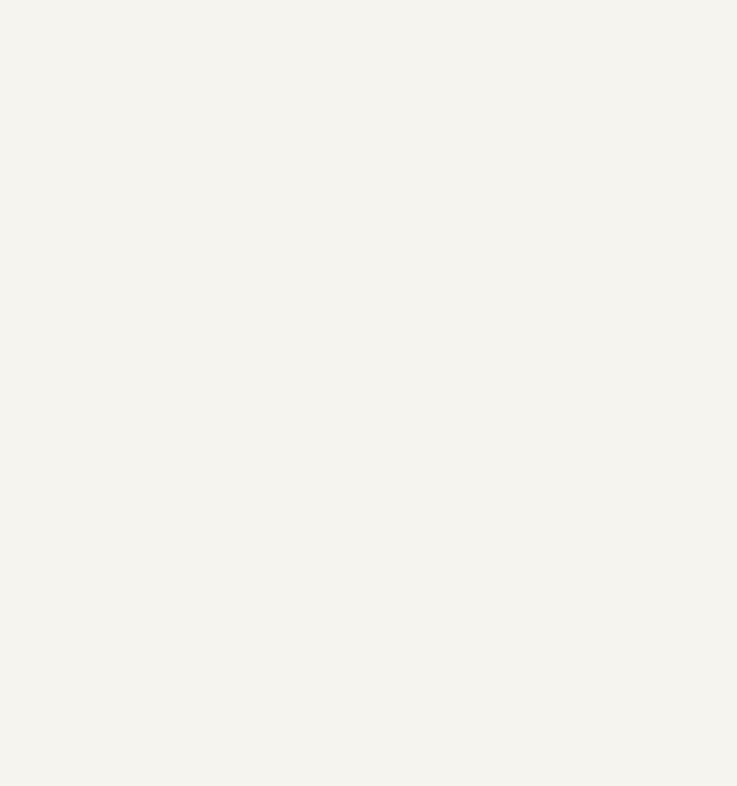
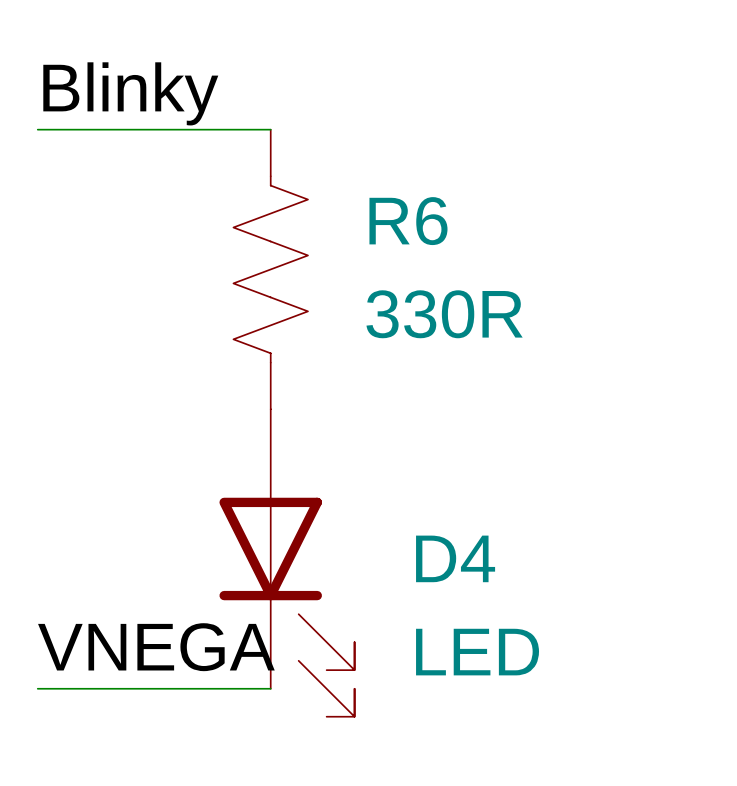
label: none -> Blinky (130, 93)
wire: none -> (37, 129) (270, 129)
R6: none -> 330R (270, 269)
D4: none -> LED (287, 562)
label: none -> VNEGA (156, 647)
wire: none -> (37, 688) (270, 688)

